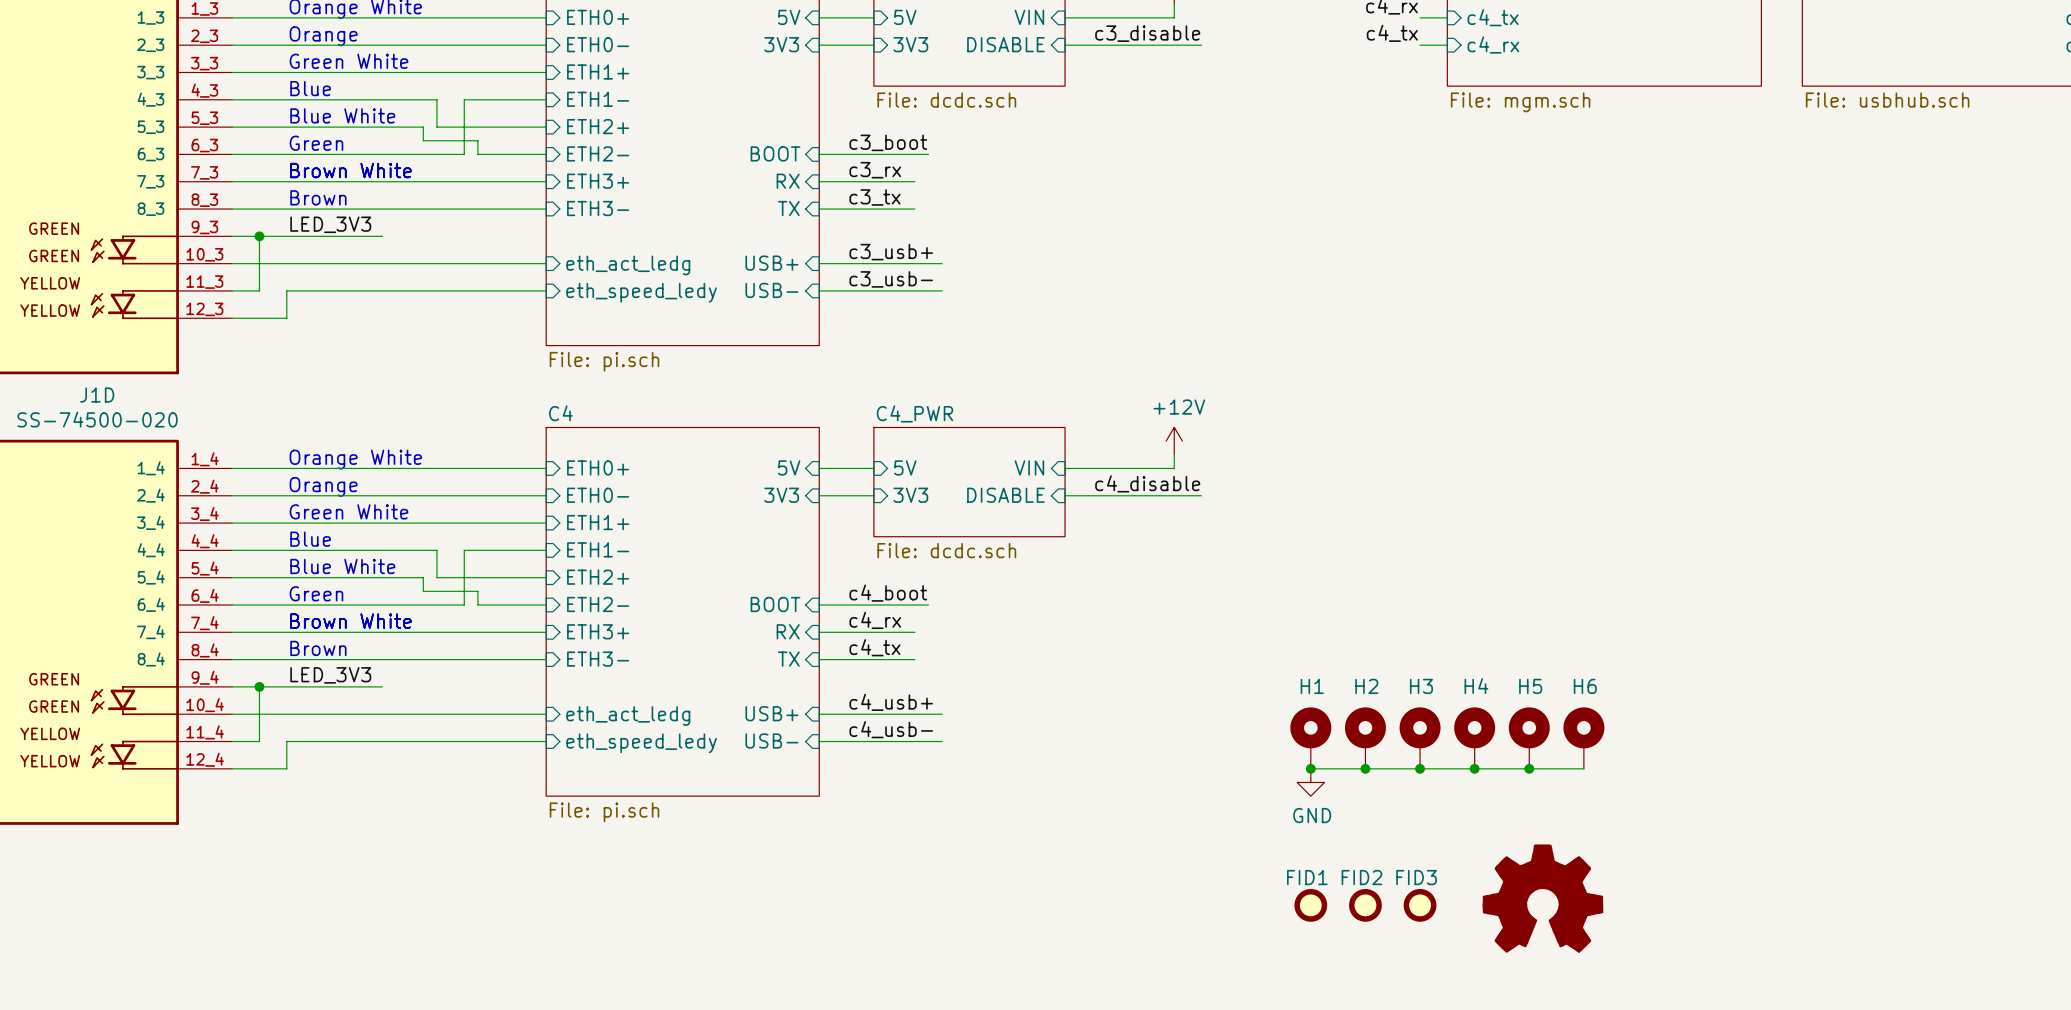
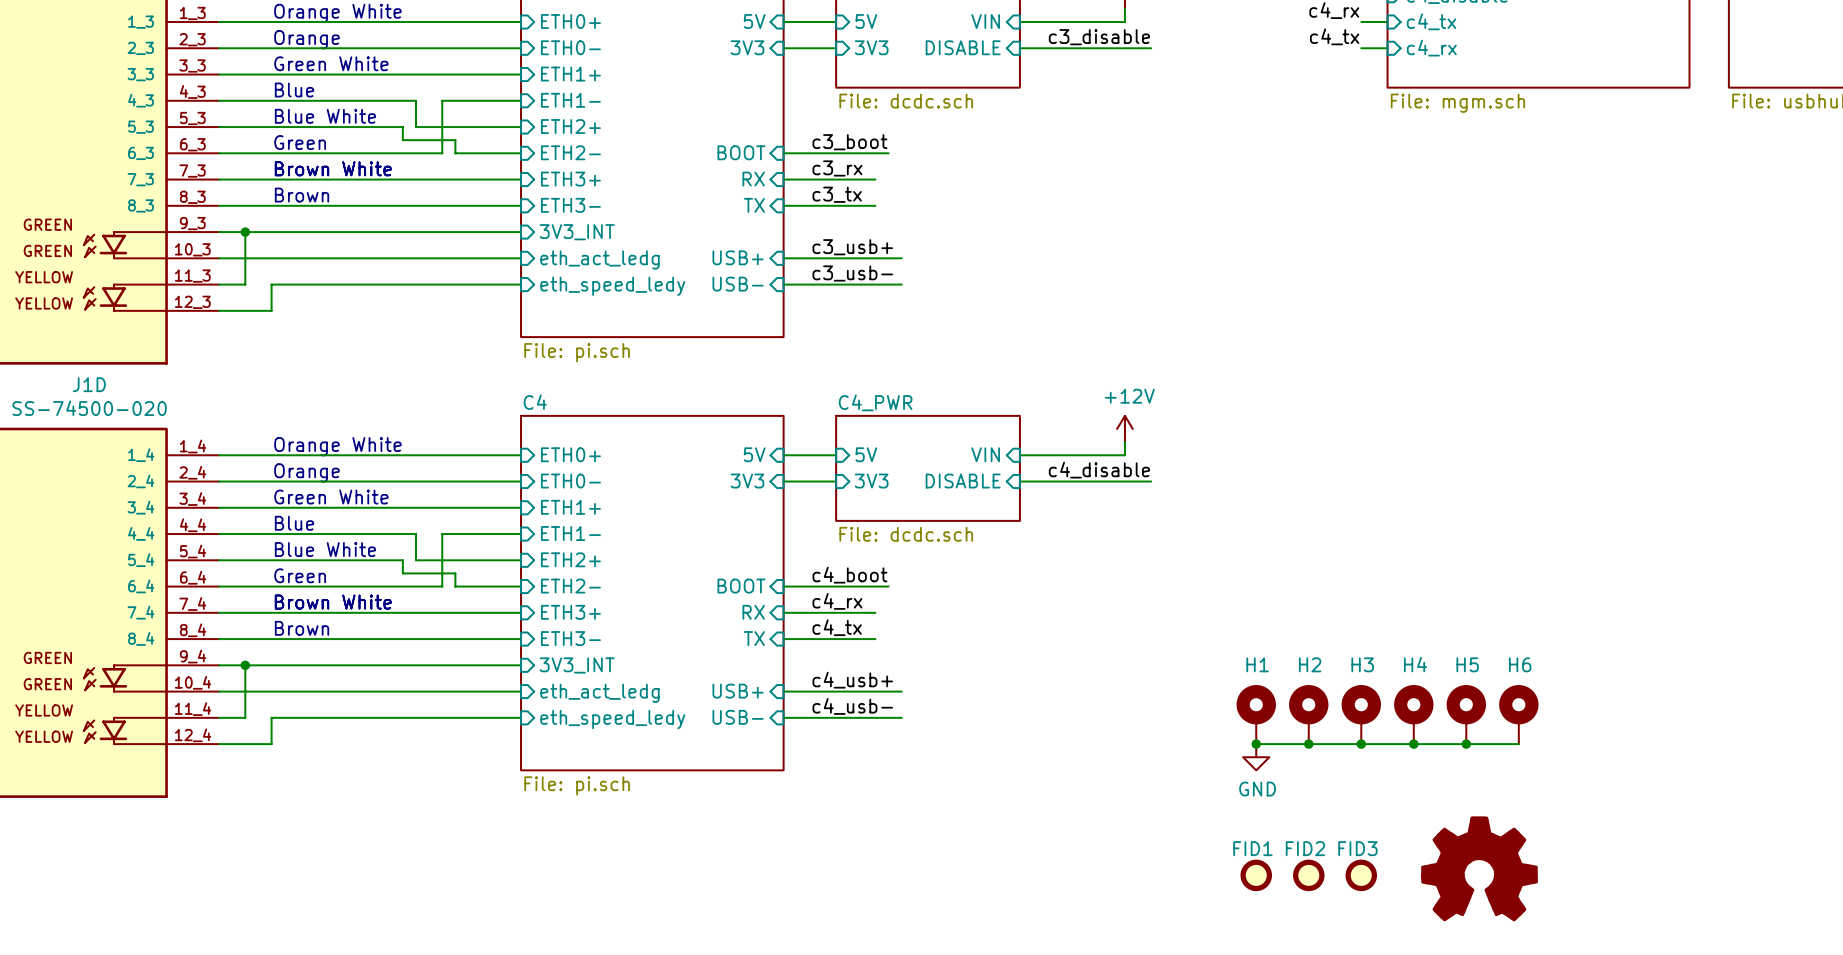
label: LED_3V3 (330, 224) -> none
wire: none -> (363, 232) (521, 232)
sheet pin: none -> 3V3_INT (577, 232)
label: LED_3V3 (330, 675) -> none
wire: none -> (363, 665) (521, 665)
sheet pin: none -> 3V3_INT (577, 665)

